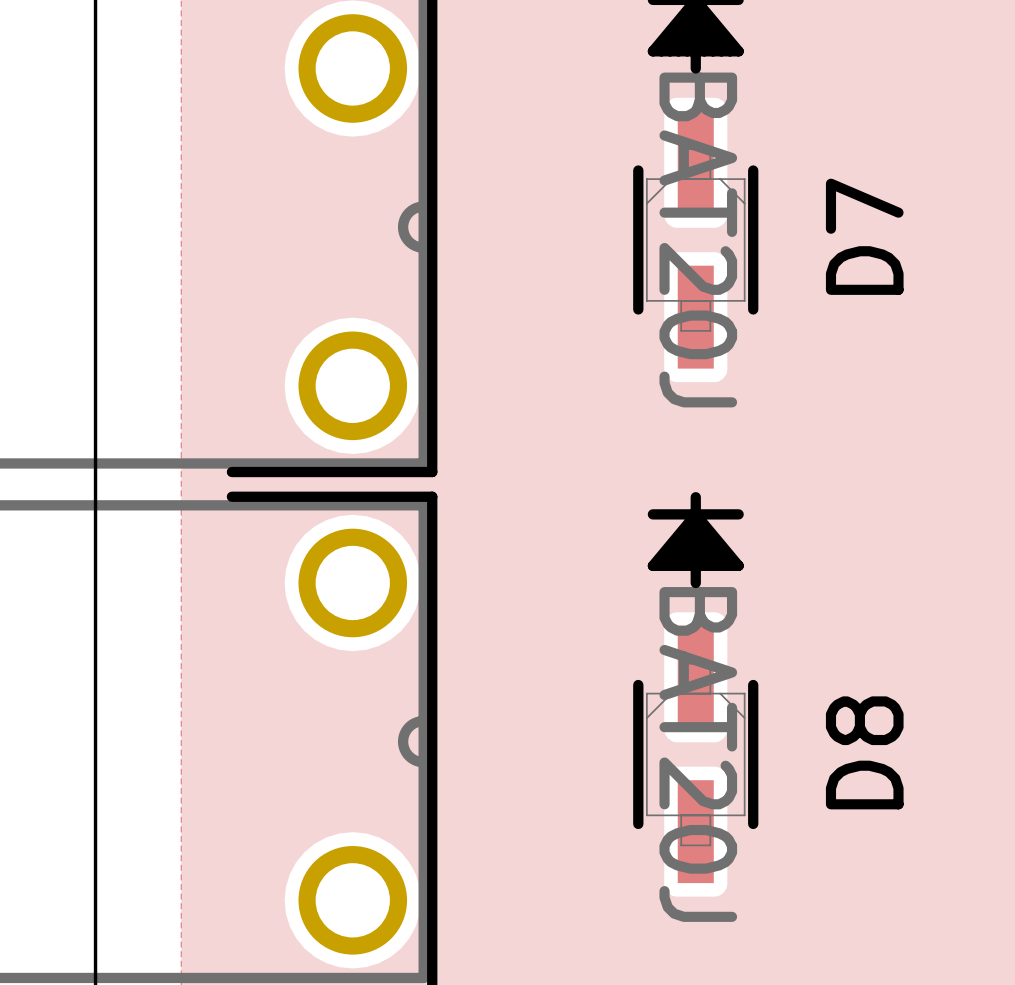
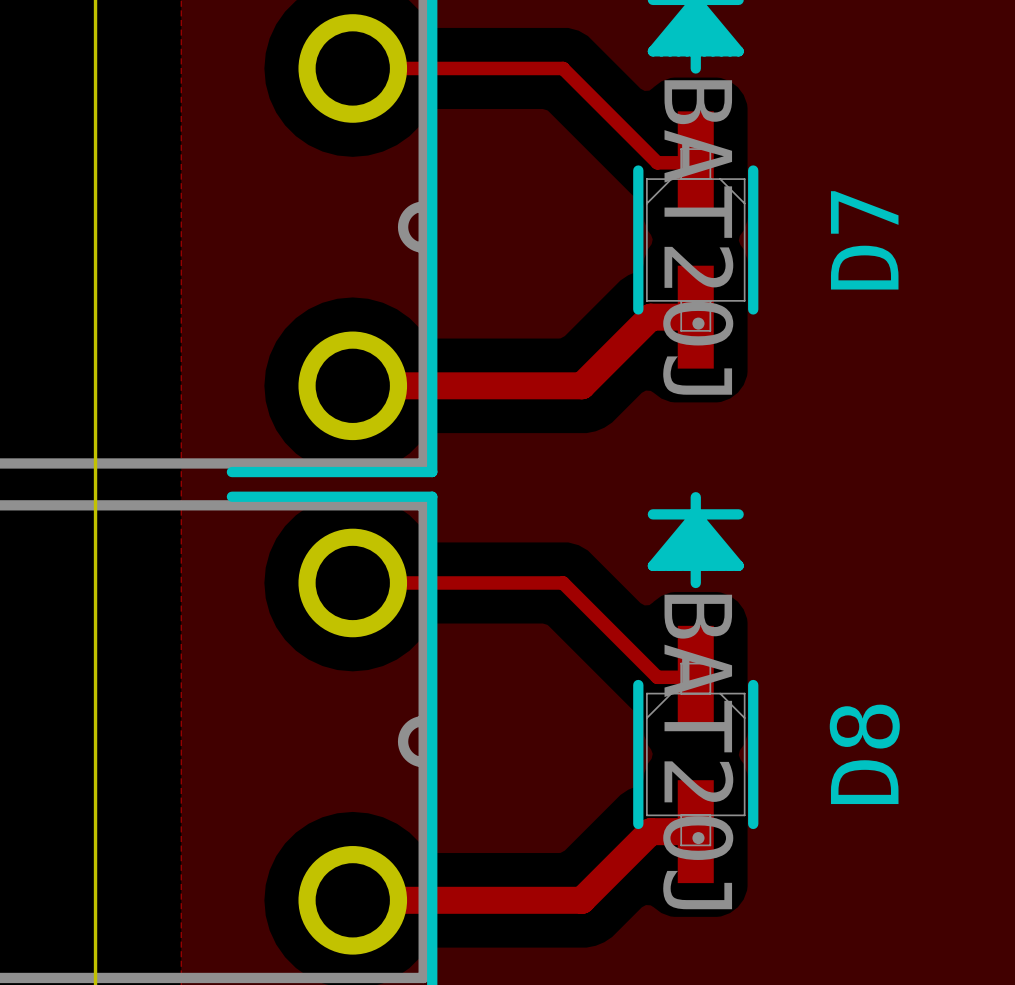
track: none -> (352, 68) (563, 68) (657, 162) (695, 162)
track: none -> (695, 317) (650, 317) (581, 385) (352, 385)
track: none -> (352, 582) (563, 582) (657, 677) (695, 677)
track: none -> (695, 831) (650, 831) (581, 900) (352, 900)

